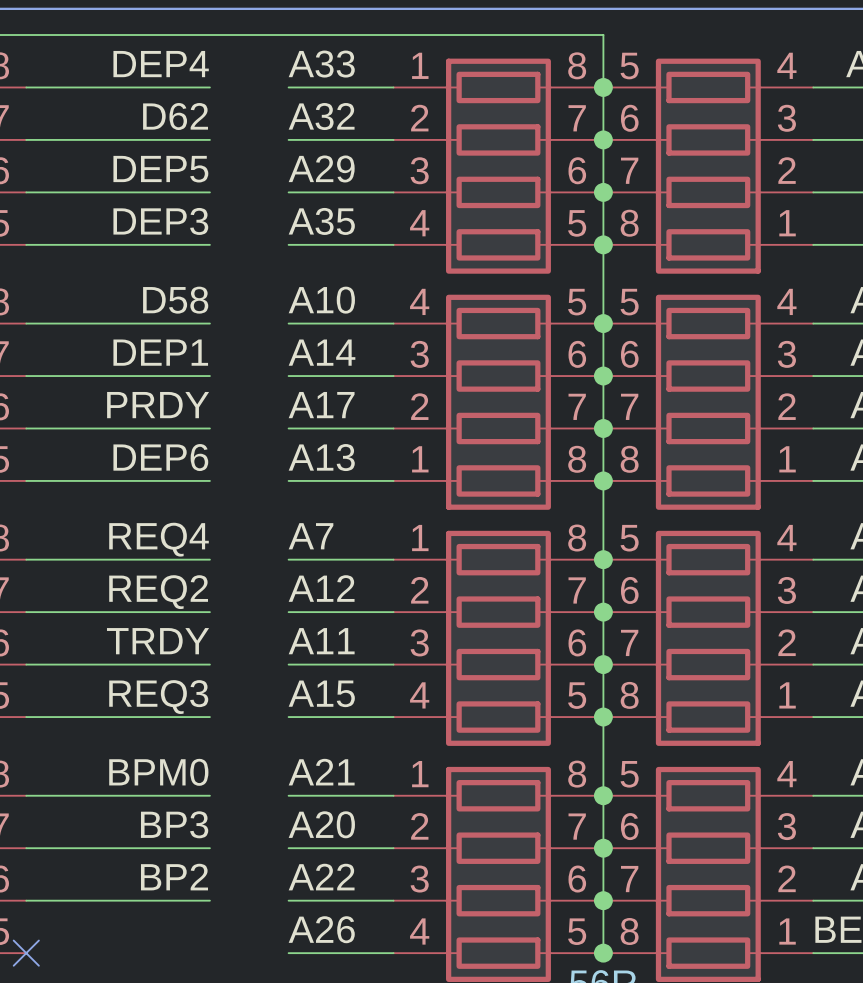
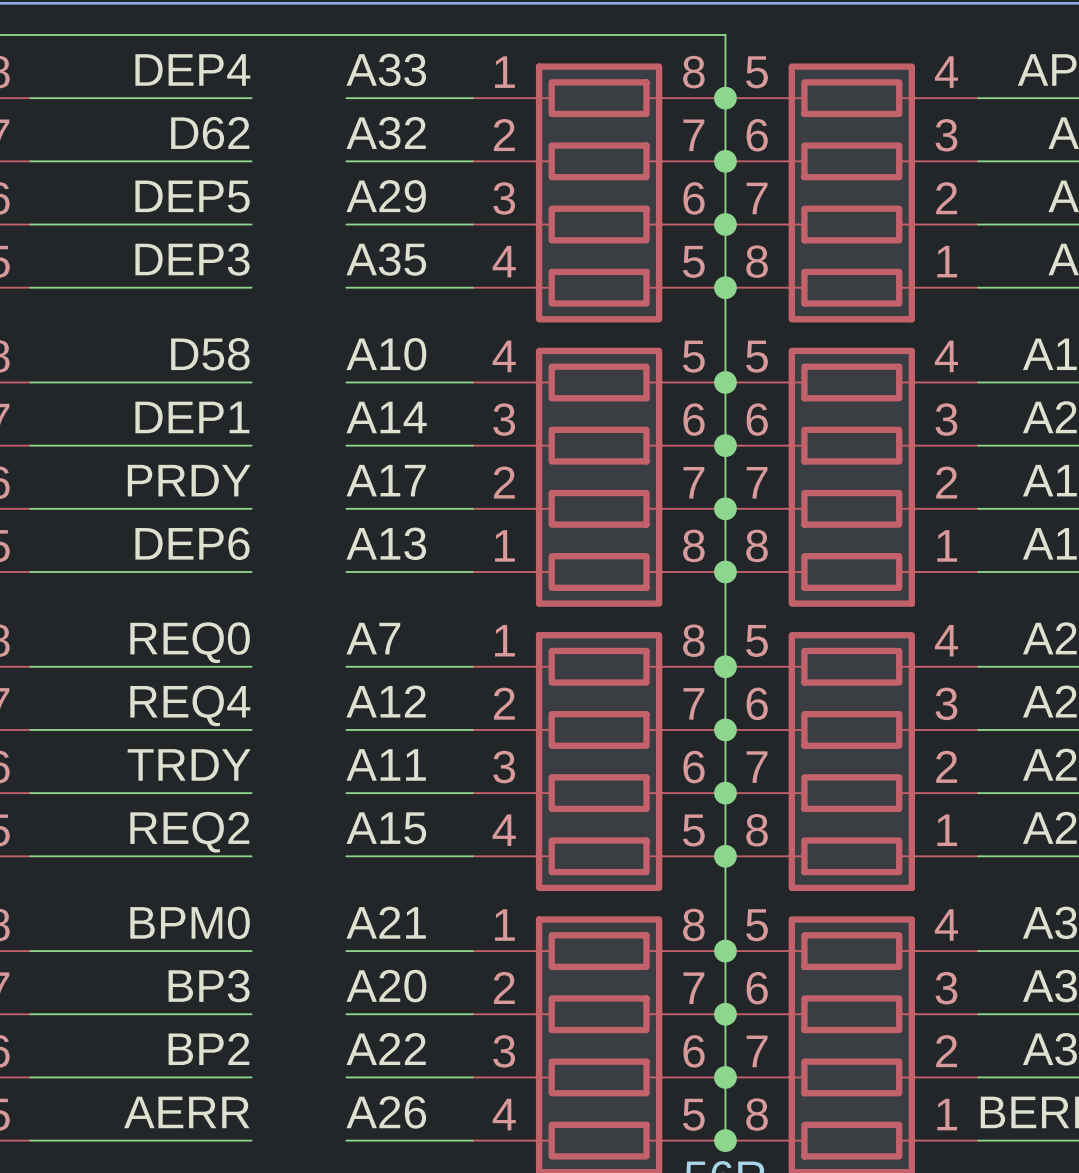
label: REQ4 (159, 539) -> REQ0 (190, 642)
label: REQ2 (158, 592) -> REQ4 (190, 705)
label: REQ3 (158, 697) -> REQ2 (189, 832)
label: none -> AERR (186, 1112)
wire: none -> (30, 1140) (251, 1140)
no-connect mark: (26, 953) -> none

